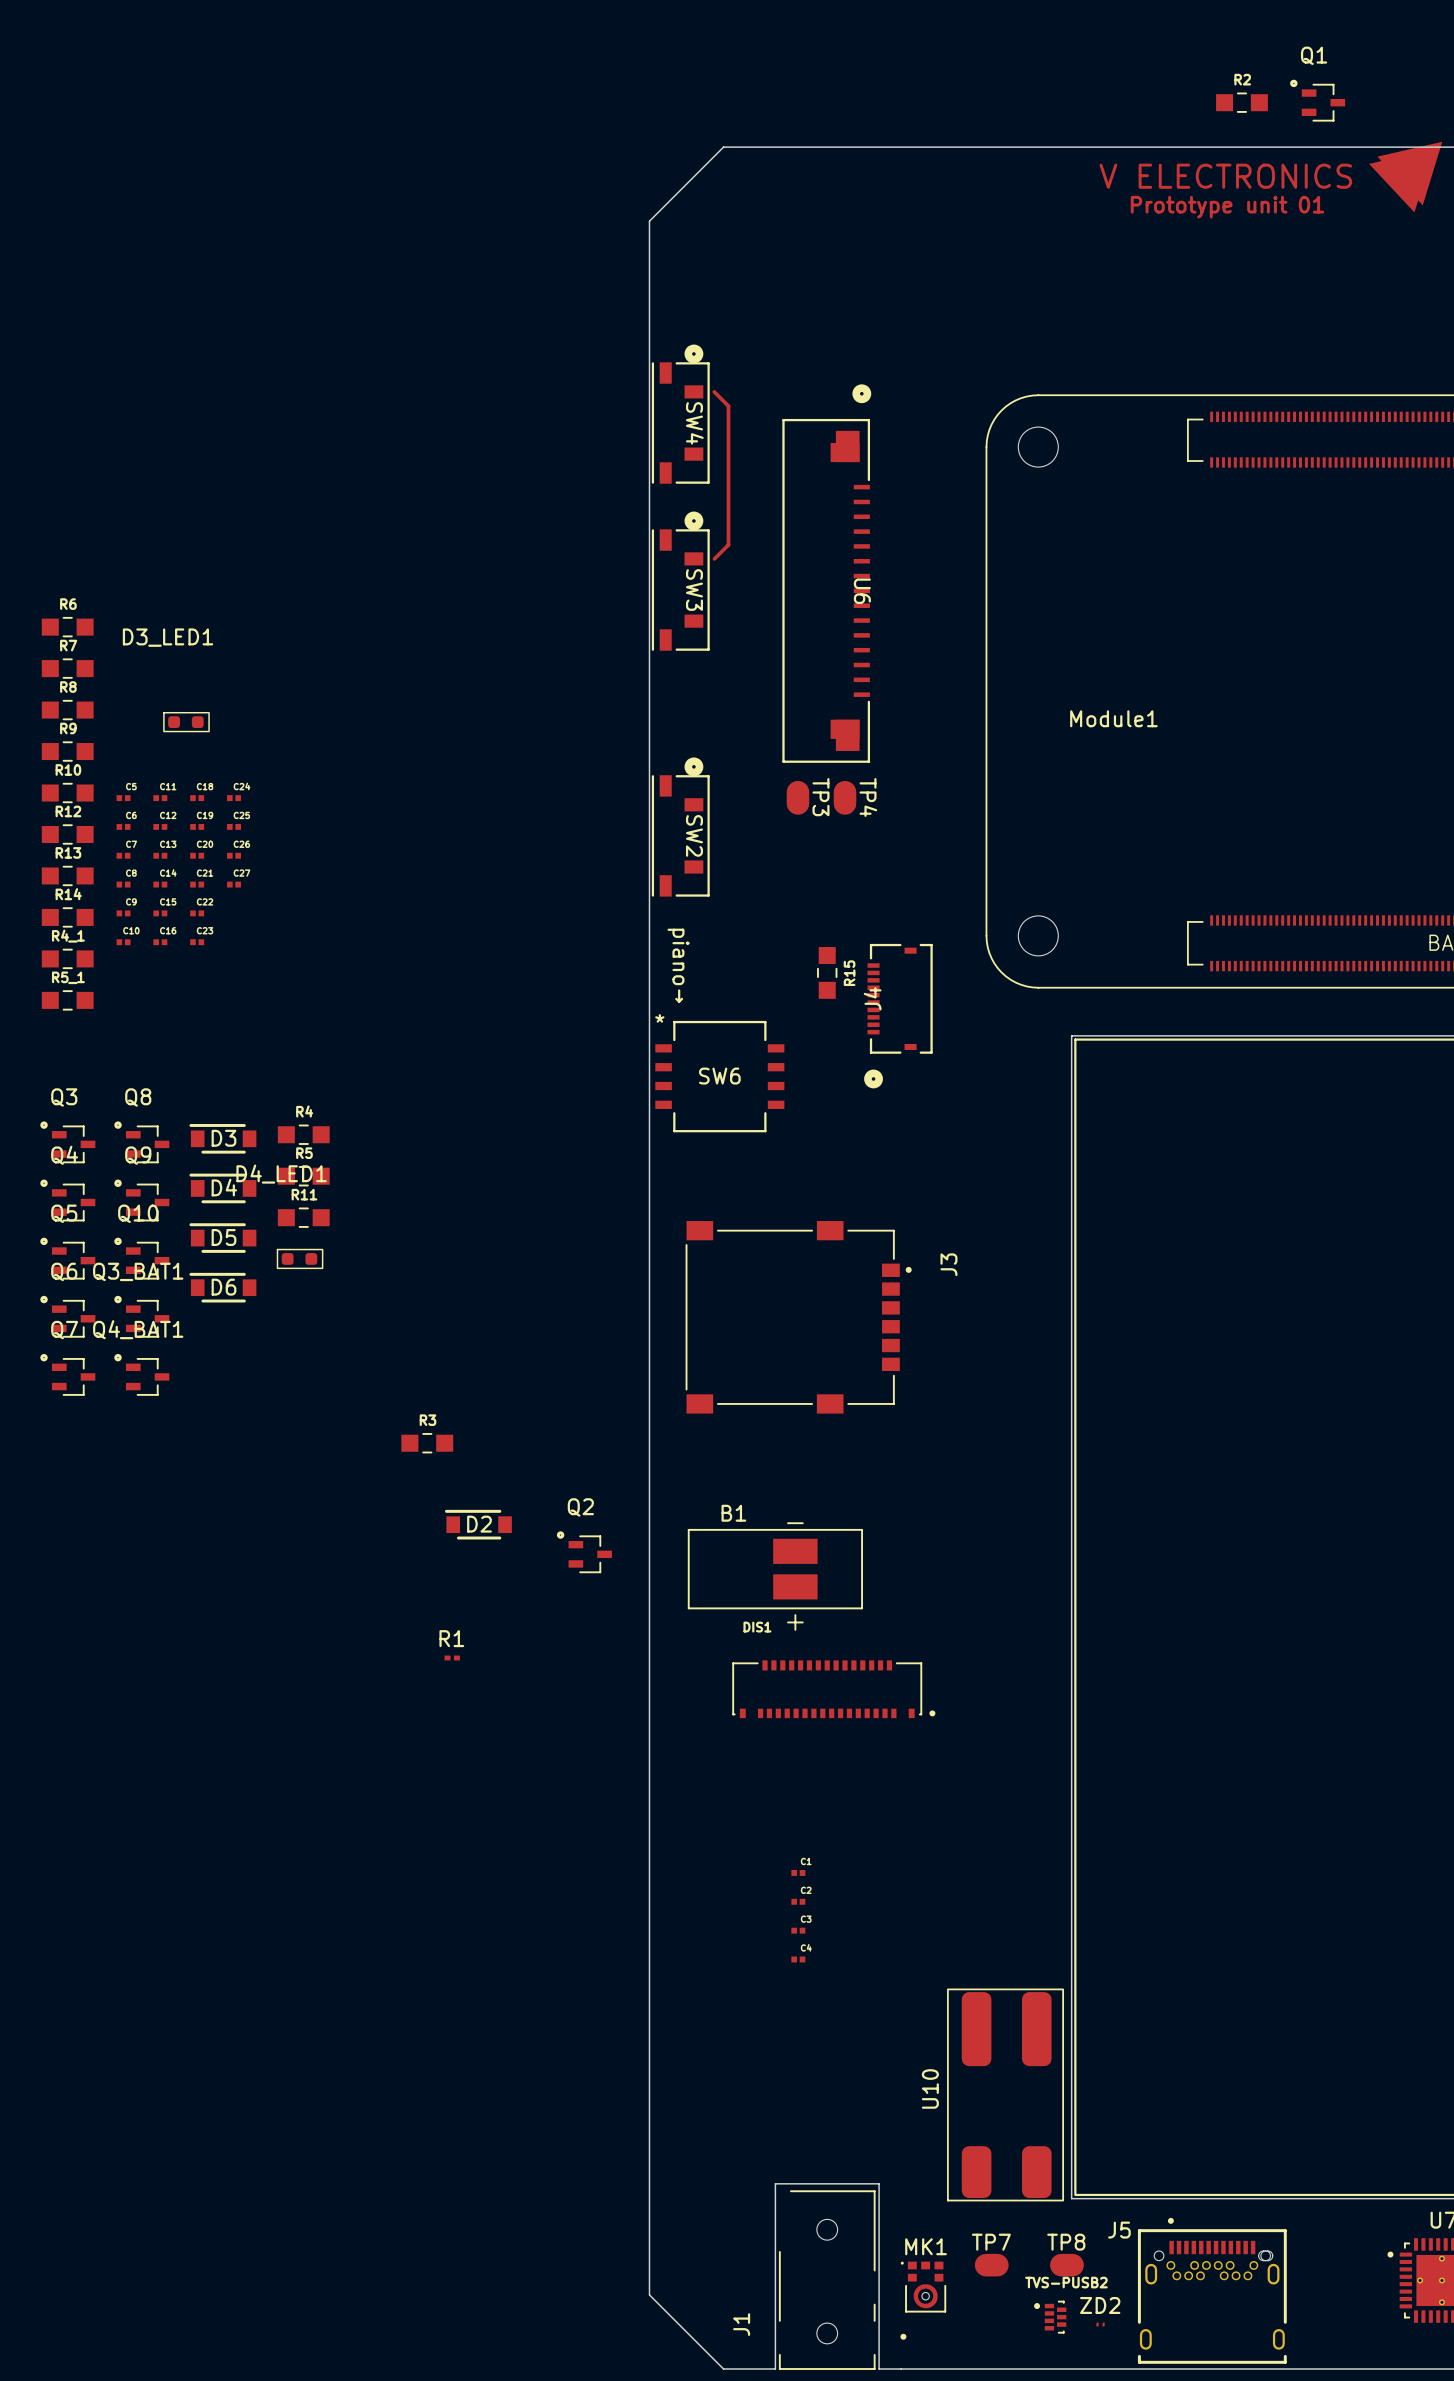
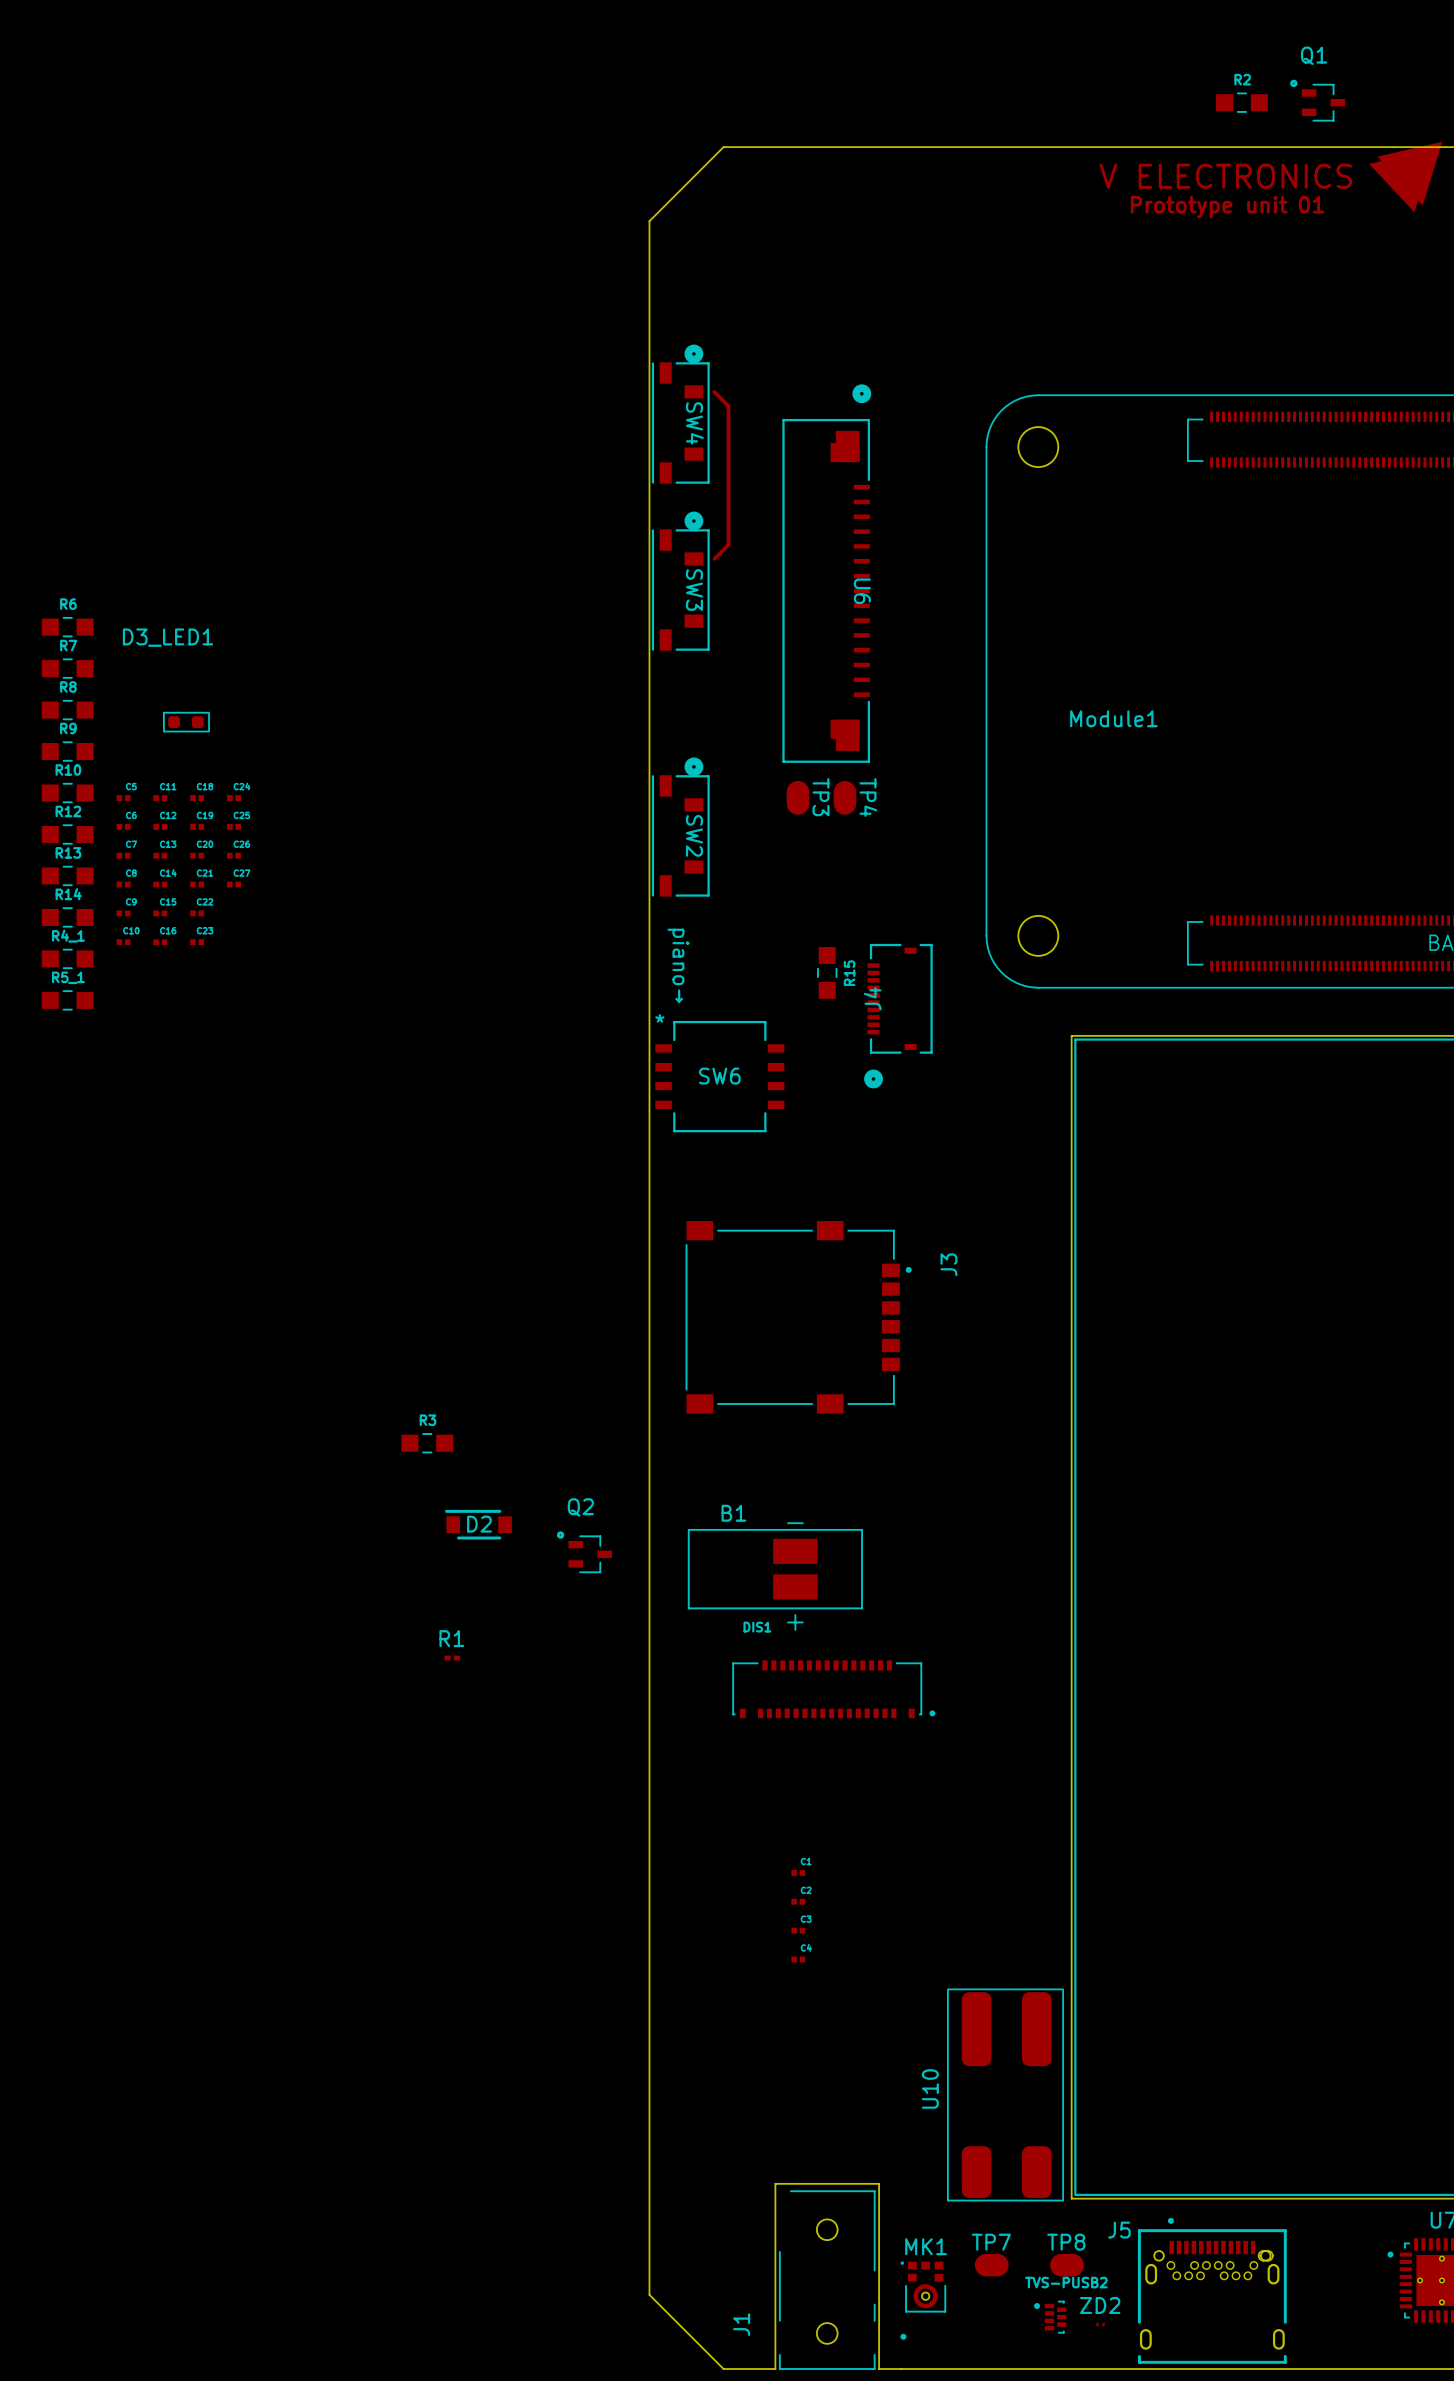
R4: (303, 1134) -> none
D3: (222, 1138) -> none
Q3: (67, 1142) -> none
Q8: (141, 1142) -> none
R5: (303, 1176) -> none
D4: (222, 1188) -> none
Q4: (67, 1200) -> none
Q9: (141, 1200) -> none
R11: (303, 1217) -> none
D5: (222, 1238) -> none
Q5: (67, 1258) -> none
Q10: (141, 1258) -> none
D4_LED1: (300, 1258) -> none
D6: (222, 1287) -> none
Q6: (67, 1316) -> none
Q3_BAT1: (141, 1316) -> none
Q7: (67, 1374) -> none
Q4_BAT1: (141, 1374) -> none

